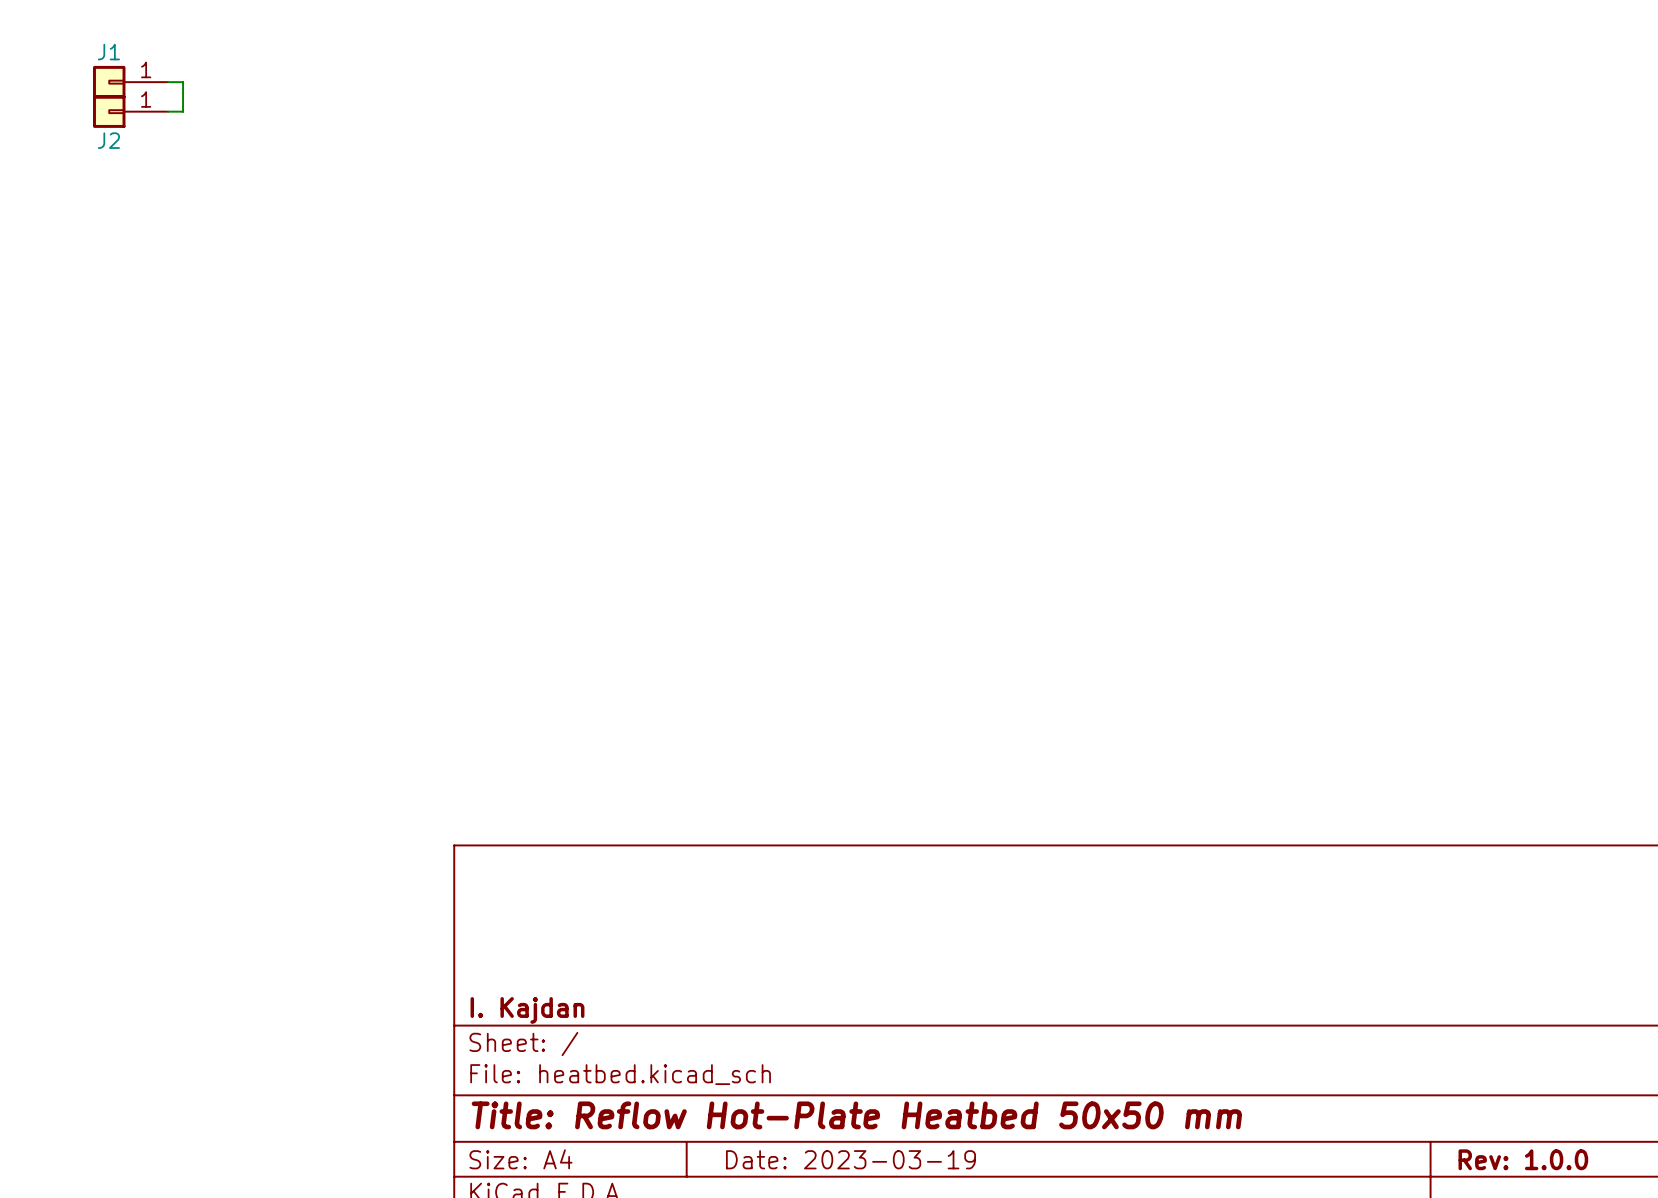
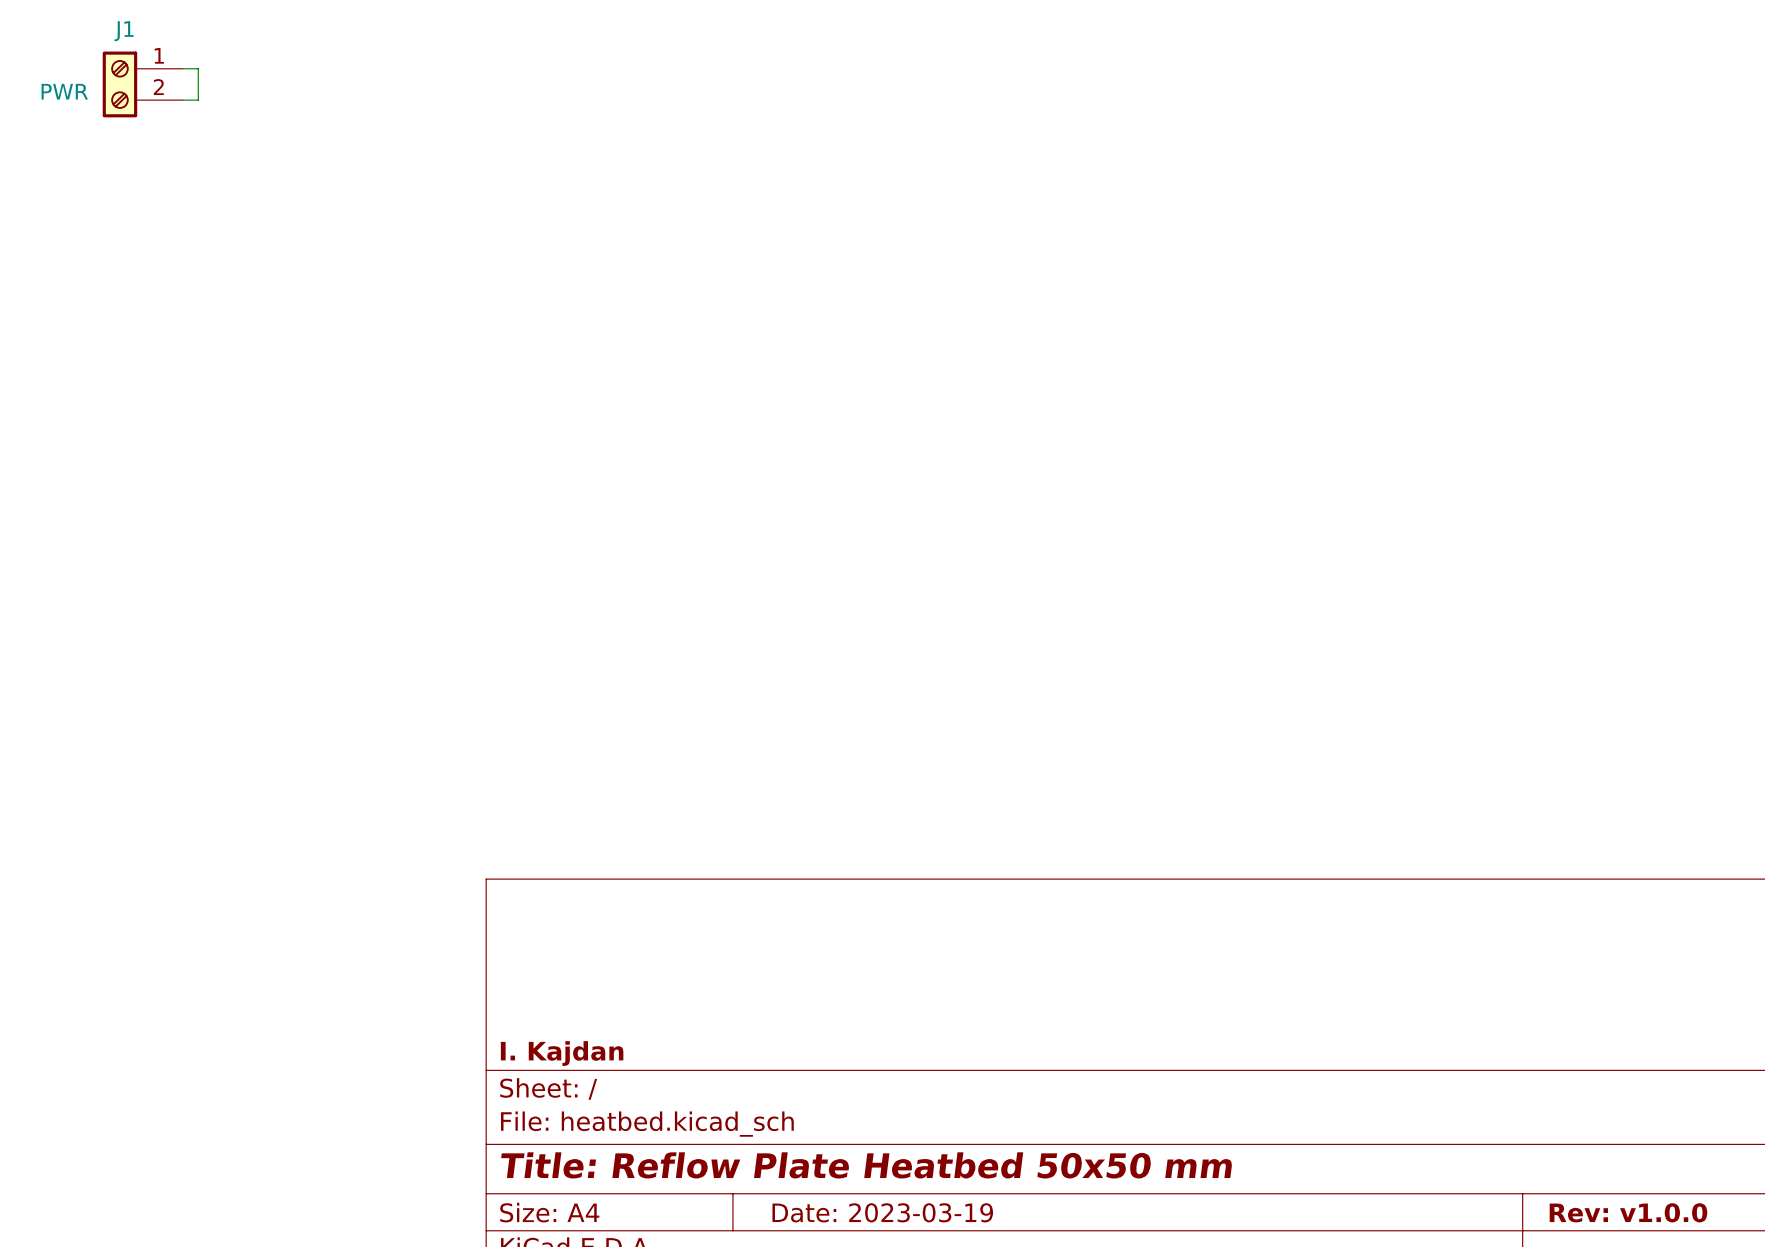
J1 symbol: [93, 65, 169, 99] -> [102, 51, 183, 118]
J1 value: none -> PWR (64, 91)
J2: (130, 111) -> none
title block: Title: Reflow Hot-Plate Heatbed 50x50 mm (856, 1115) -> Title: Reflow Plate Heatbed 50x50 mm (866, 1165)
title block: Rev: 1.0.0 (1523, 1159) -> Rev: v1.0.0 (1628, 1212)

